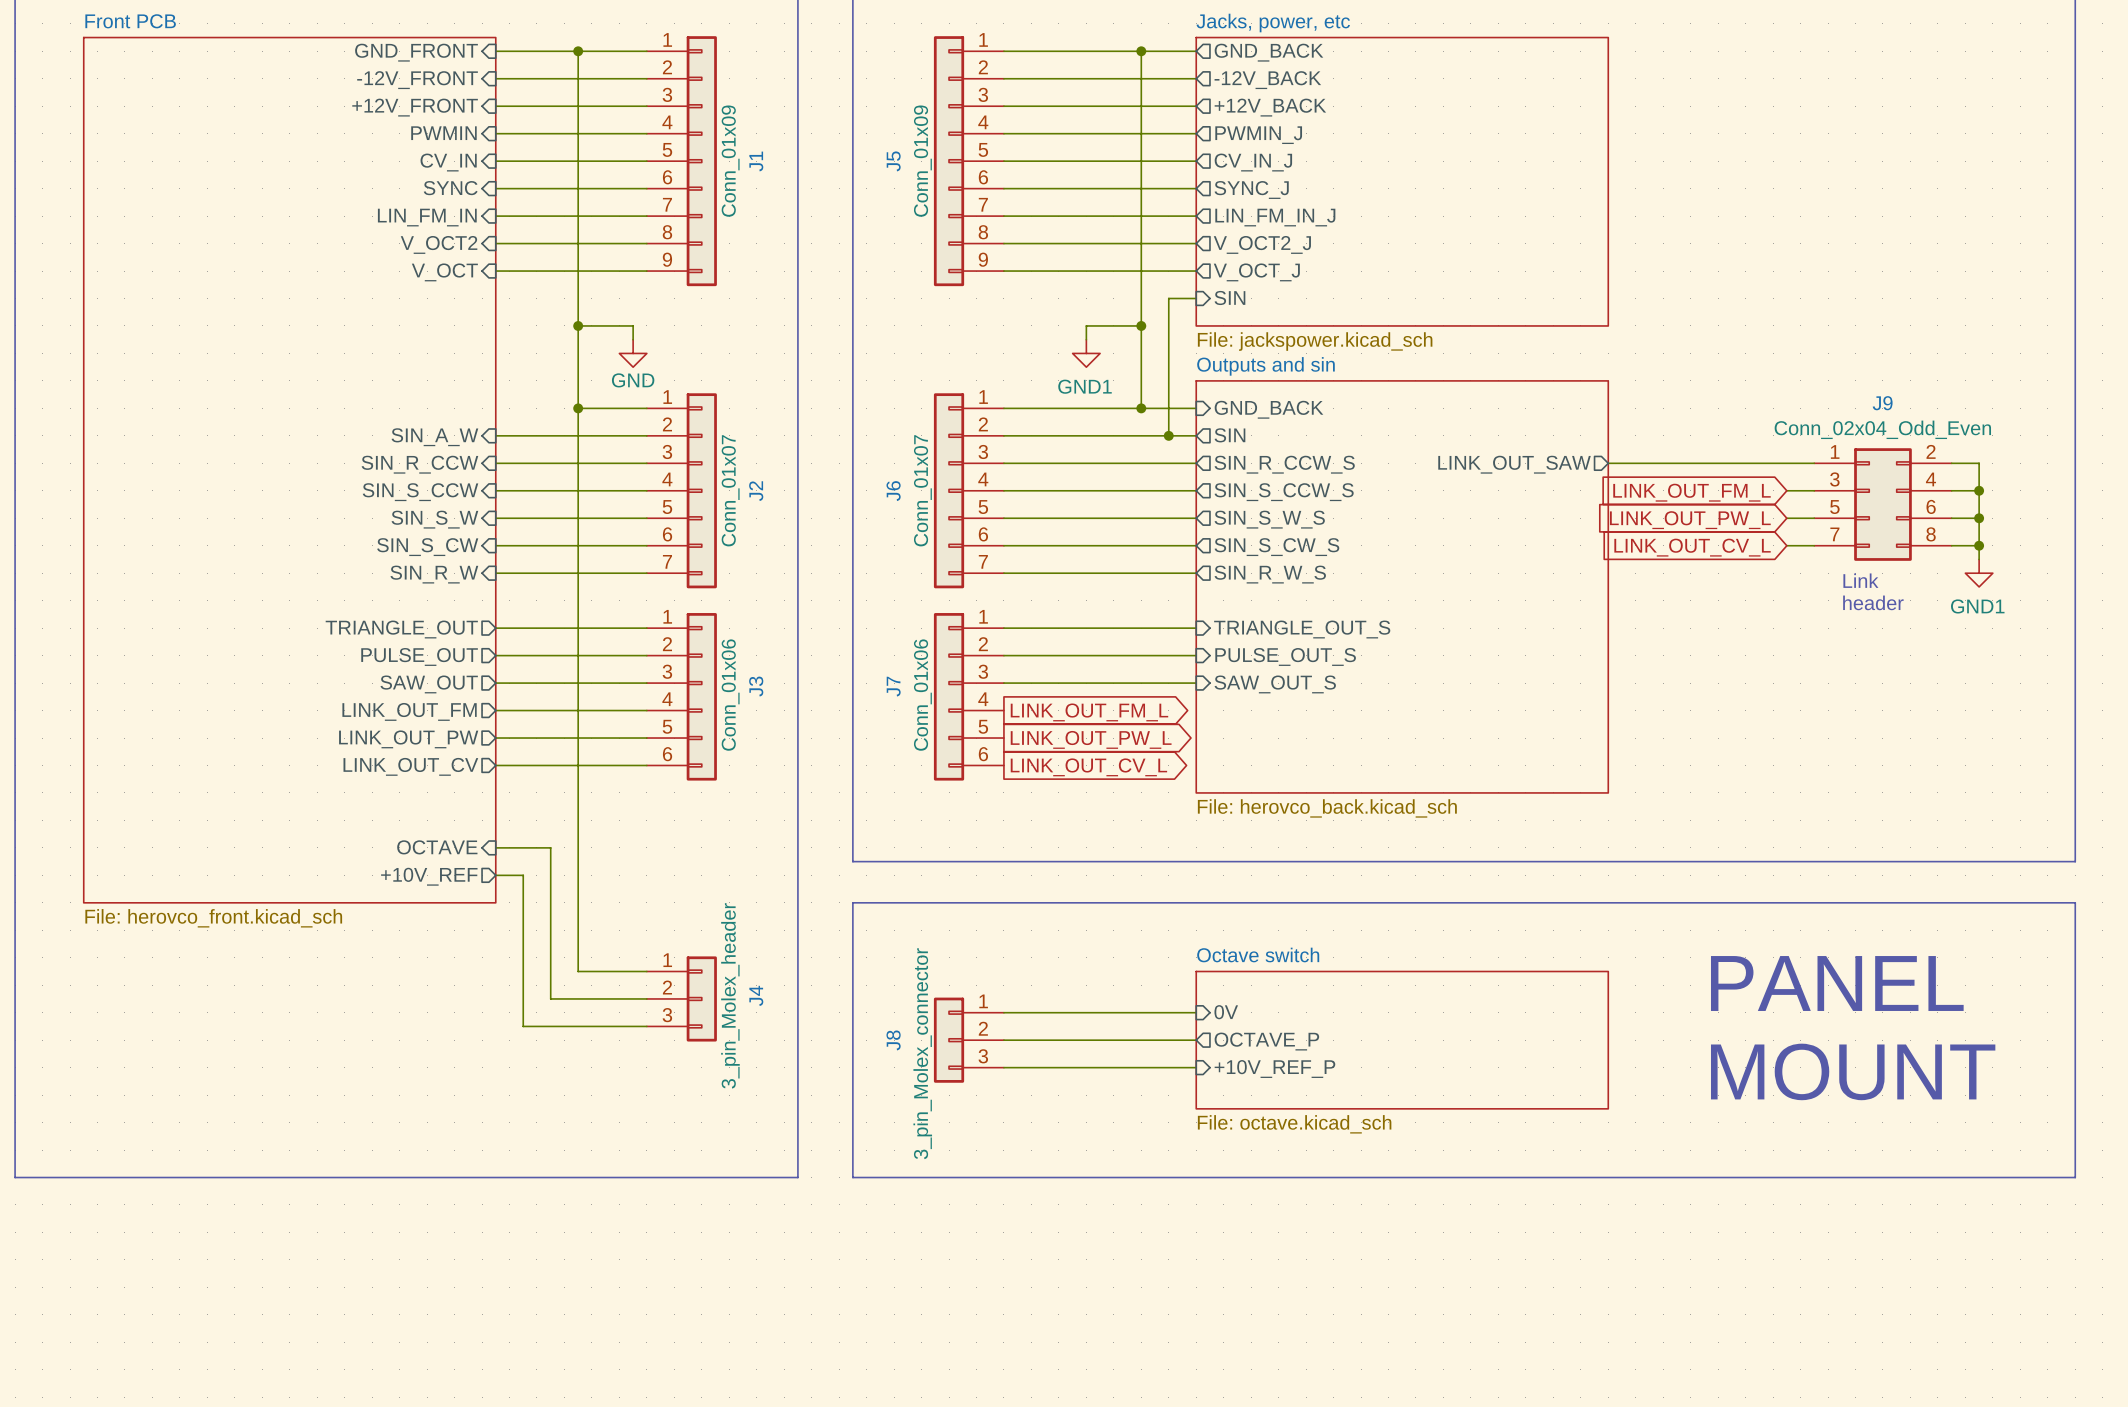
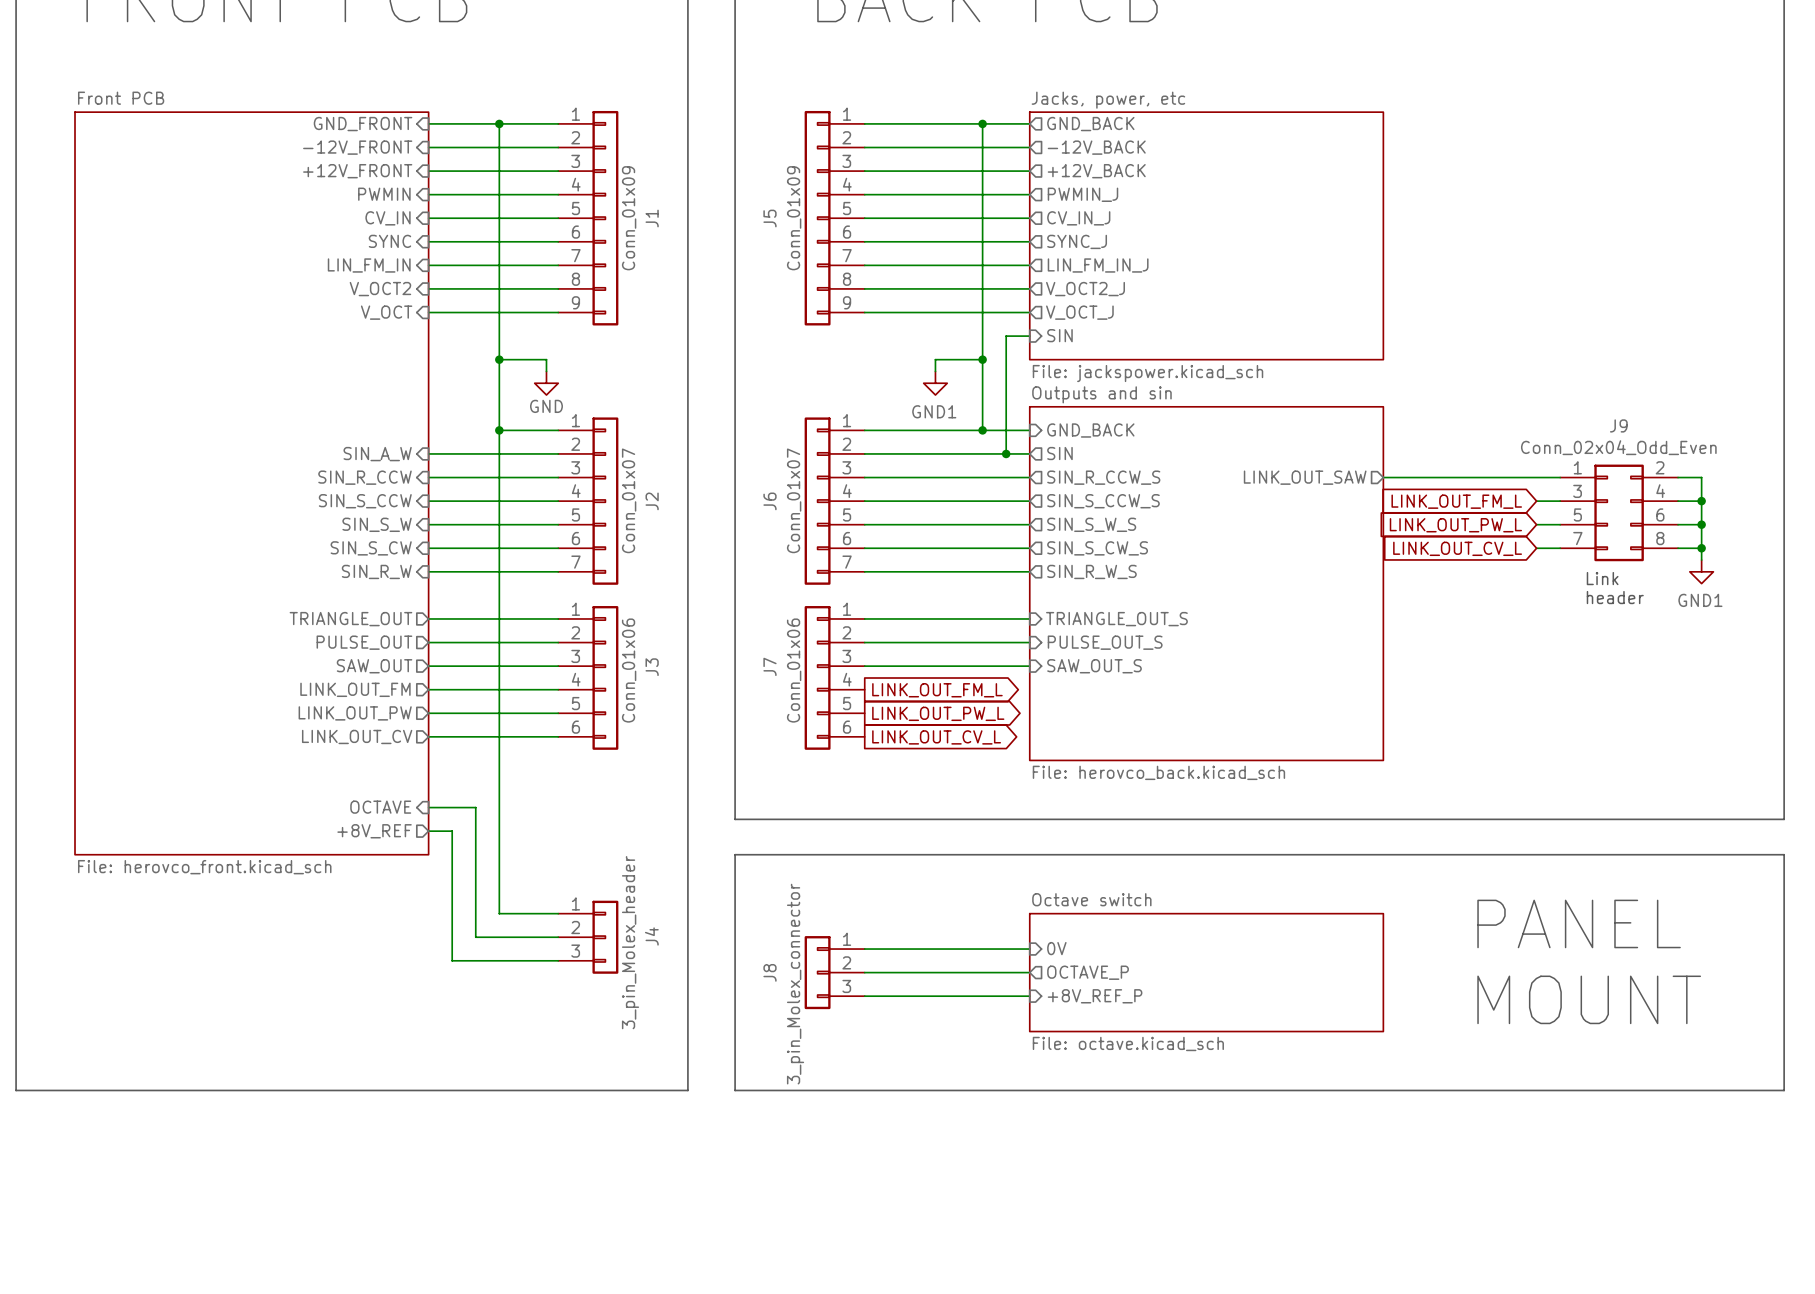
sheet pin: +10V_REF (429, 876) -> +8V_REF (374, 831)
sheet pin: +10V_REF_P (1274, 1069) -> +8V_REF_P (1095, 996)

